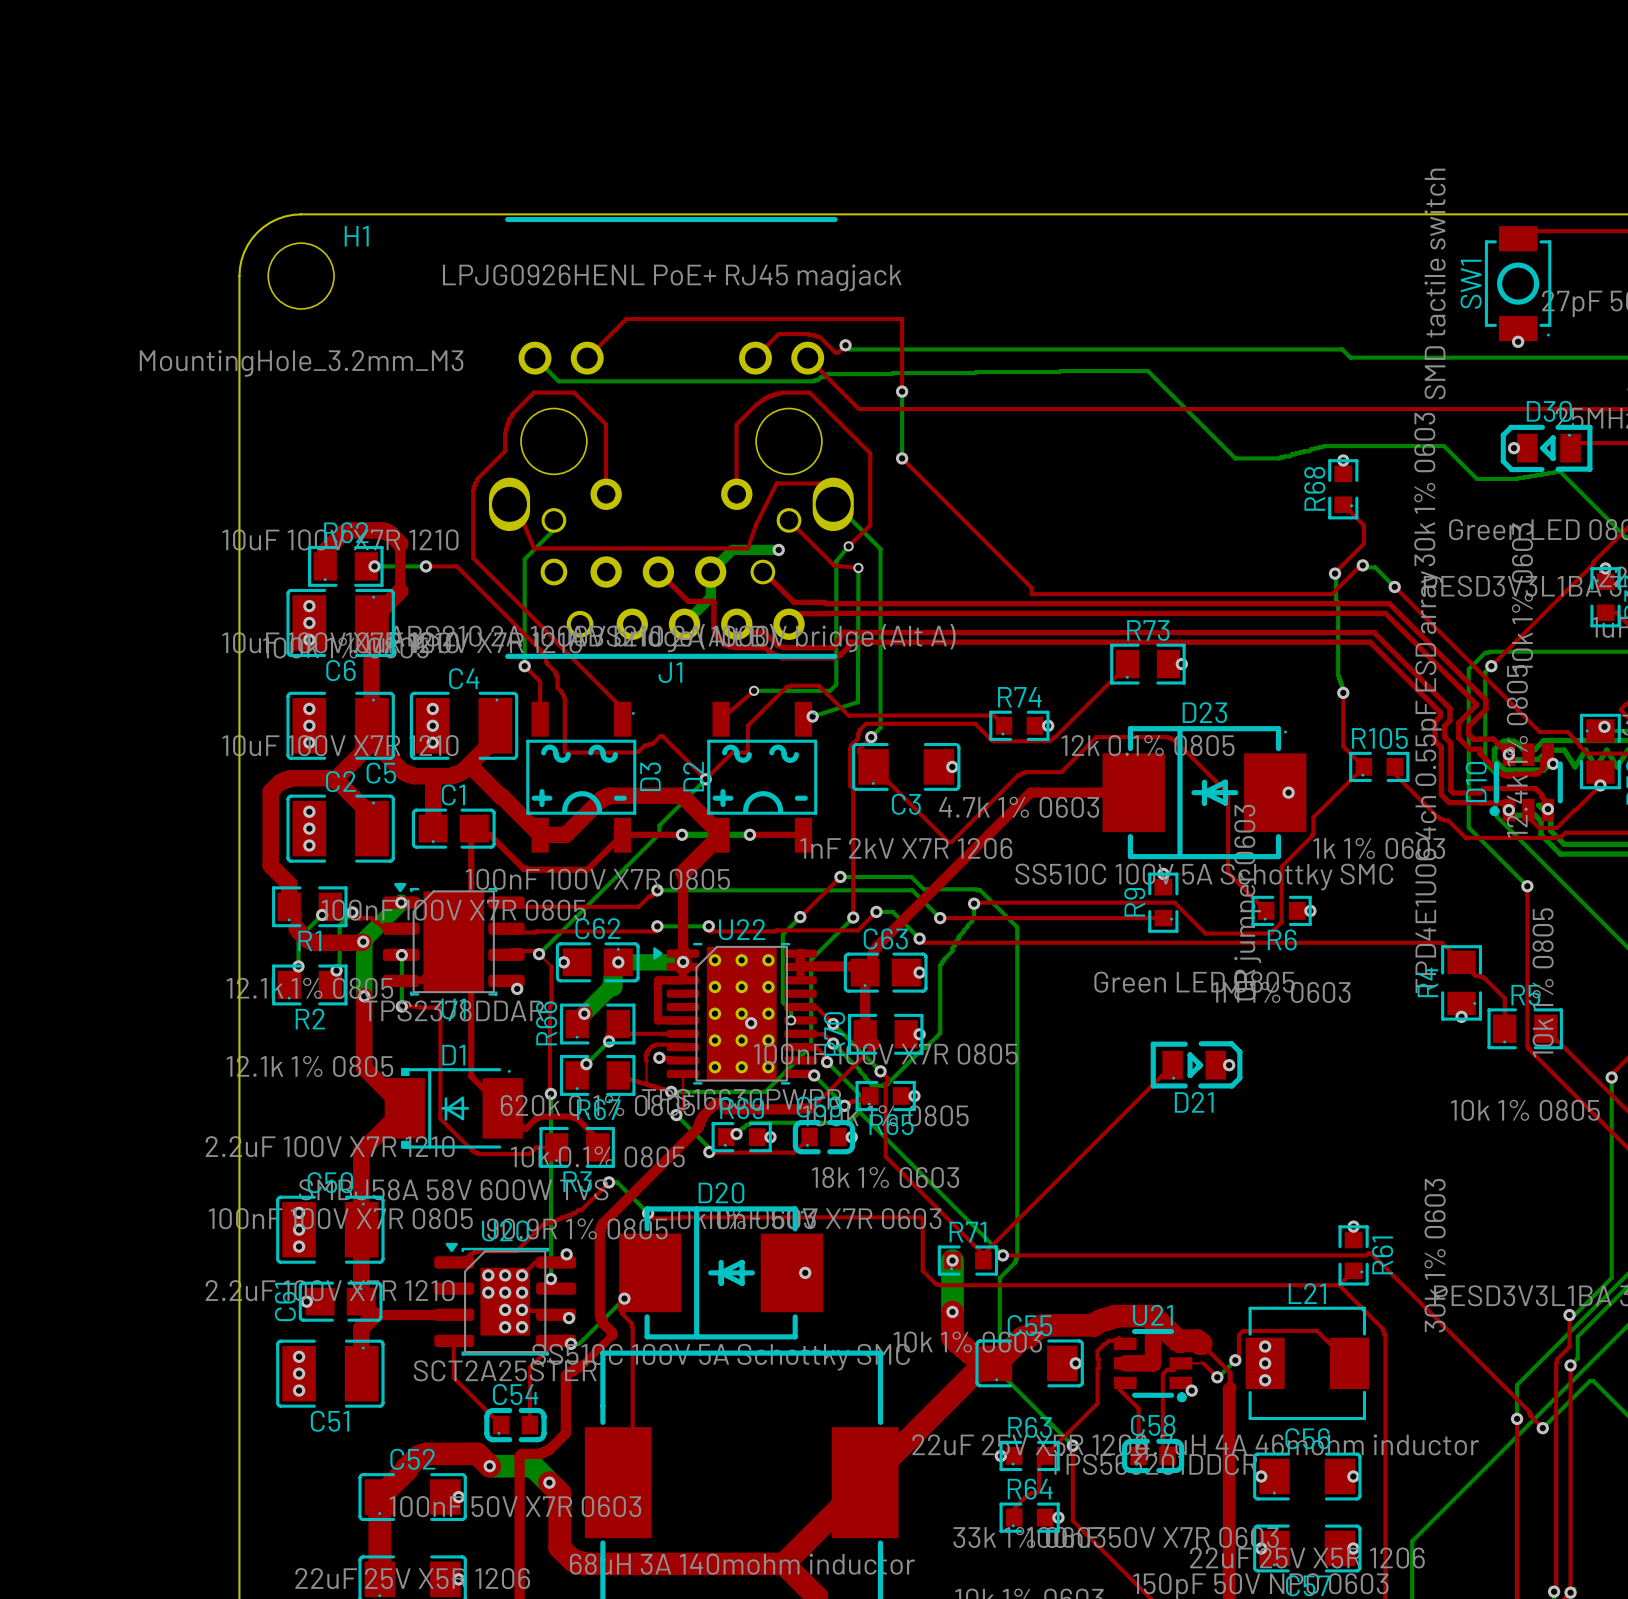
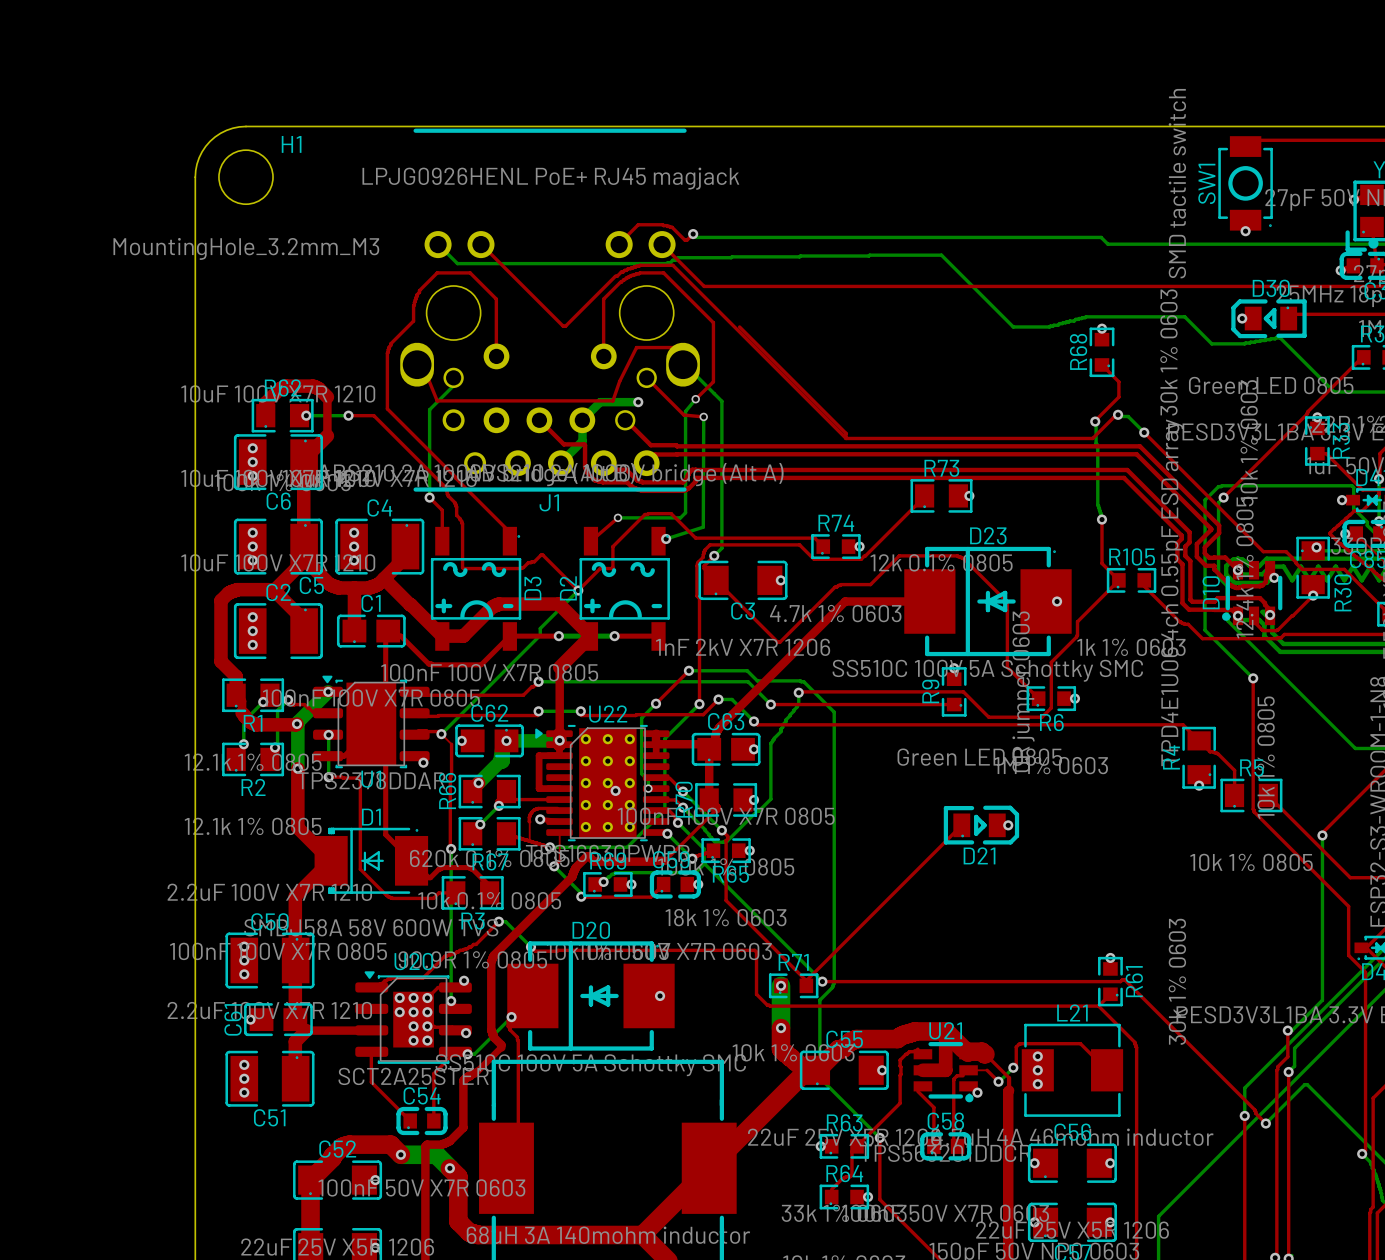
top track: (587, 358) (626, 319) (902, 319) (902, 391) -> (481, 244) (563, 326) (565, 326) (621, 272) (639, 265) (672, 265) (846, 438)
bottom track: (902, 391) (902, 458) -> none
via: (902, 391) -> none
via: (902, 458) -> none

